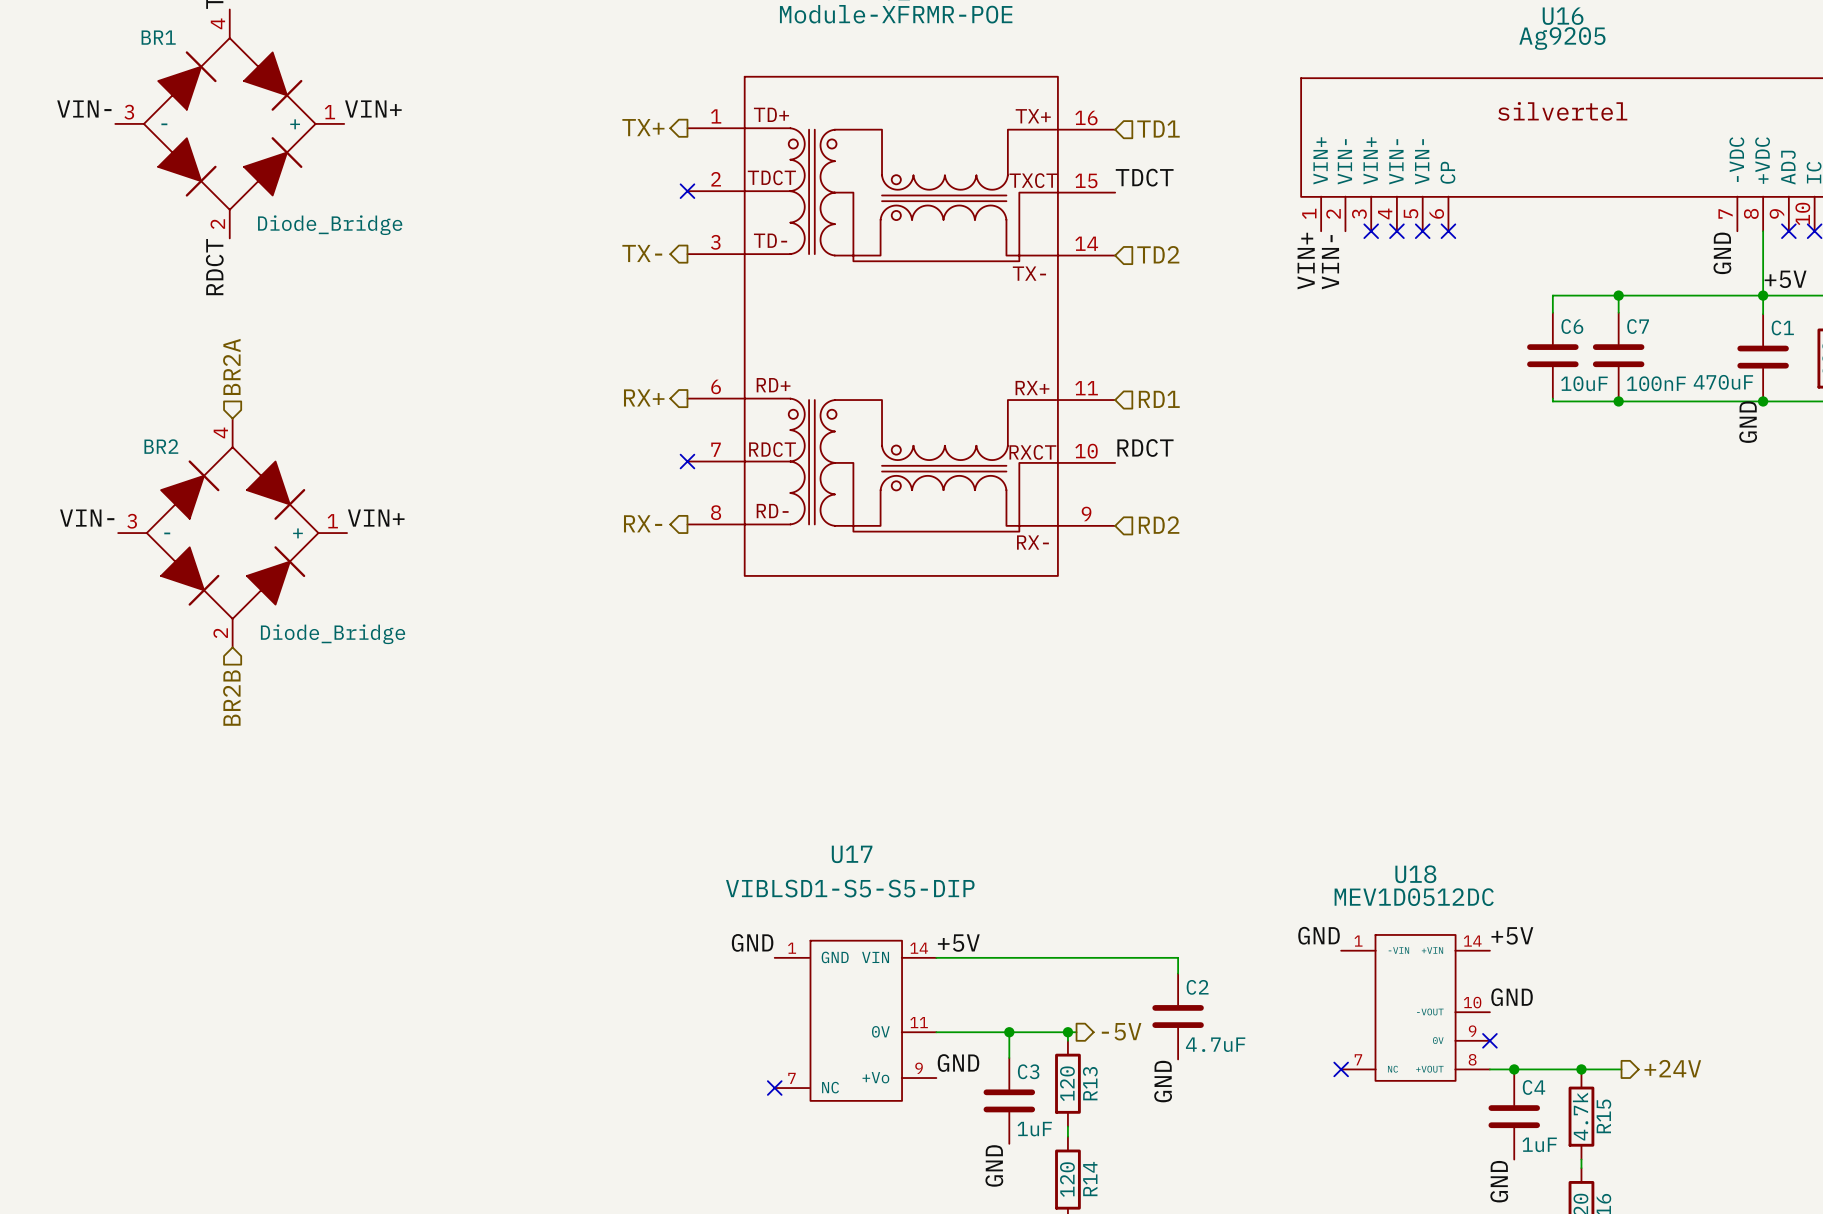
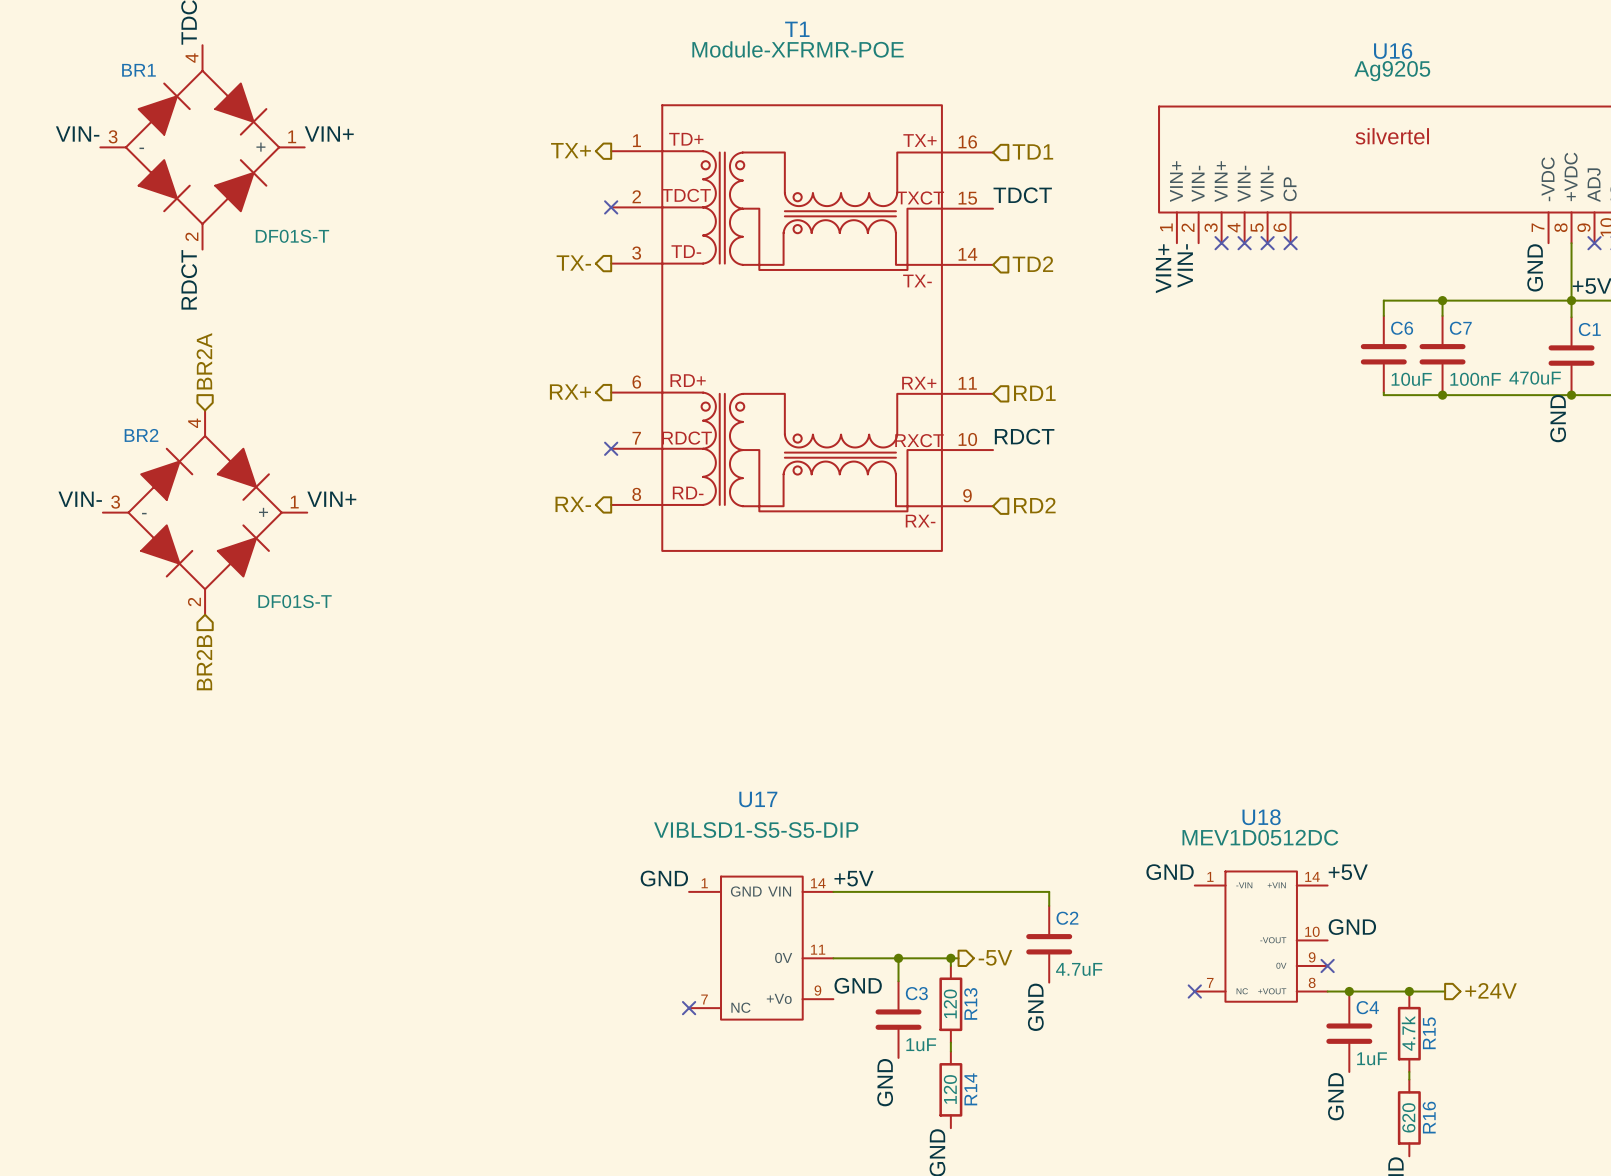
BR1 value: Diode_Bridge (330, 225) -> DF01S-T (292, 236)
BR2 value: Diode_Bridge (333, 634) -> DF01S-T (295, 601)

